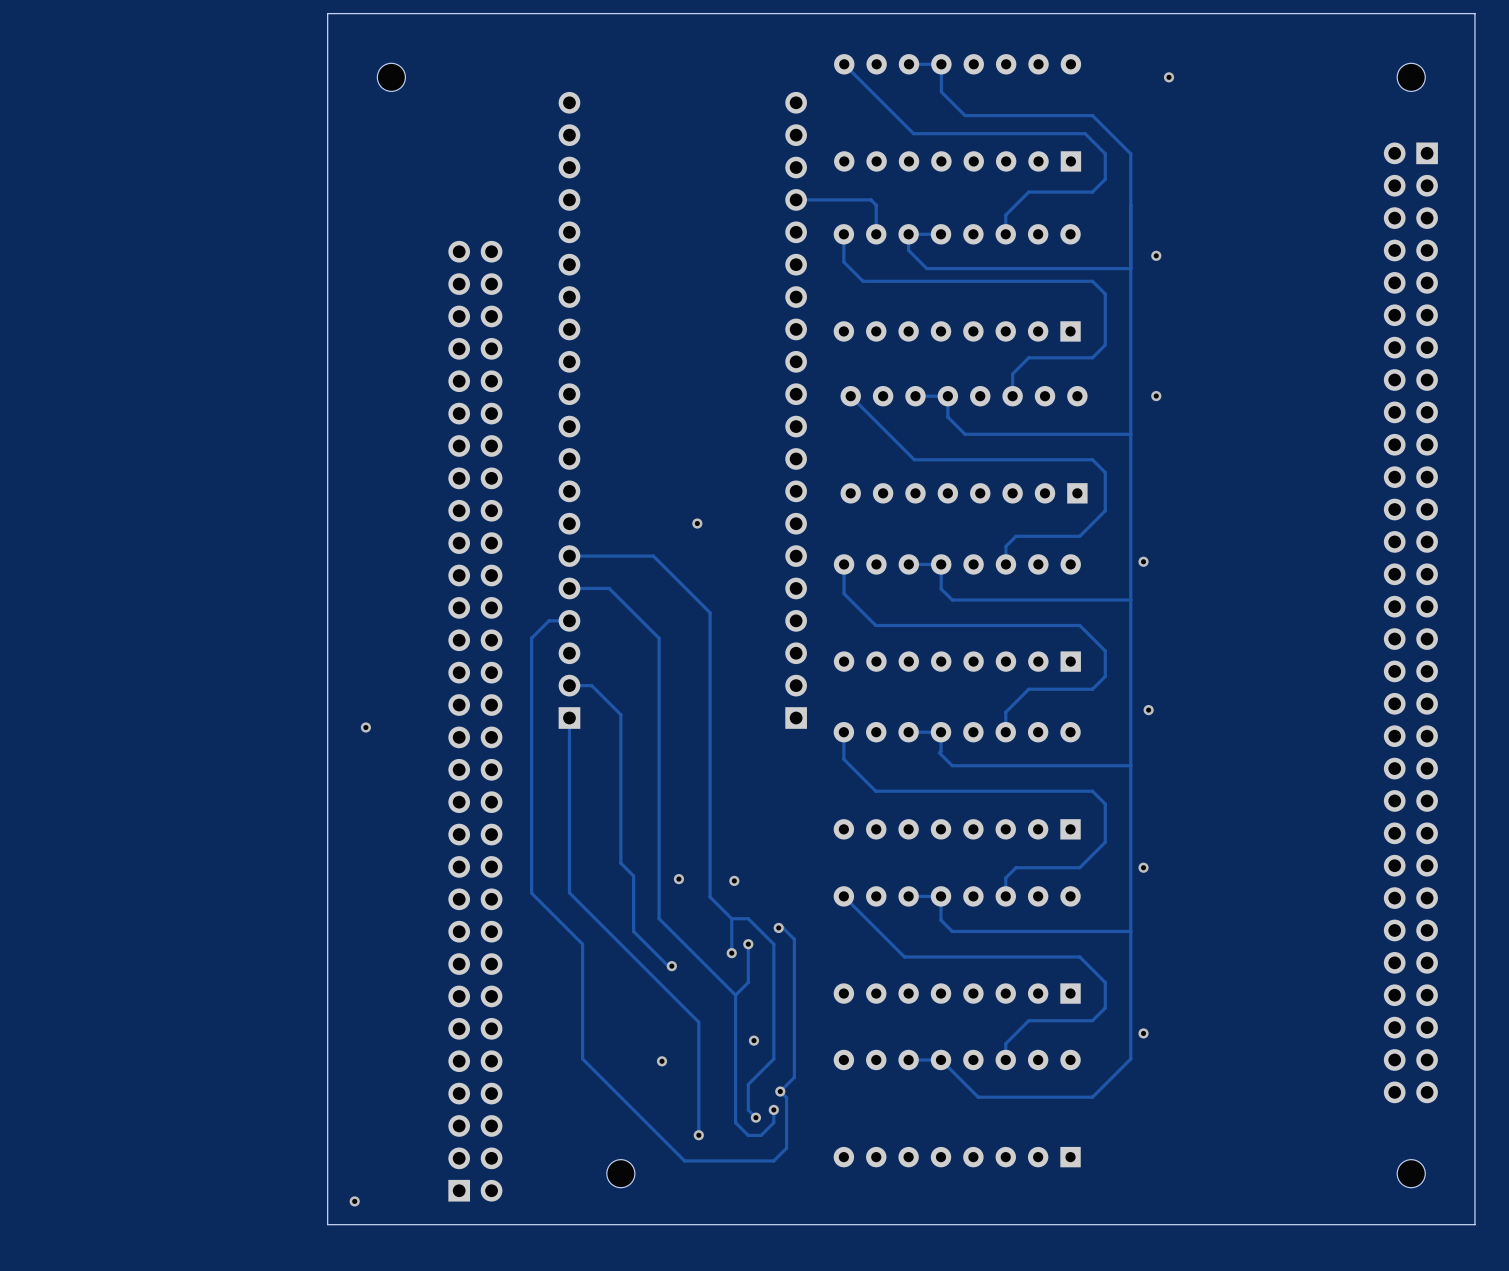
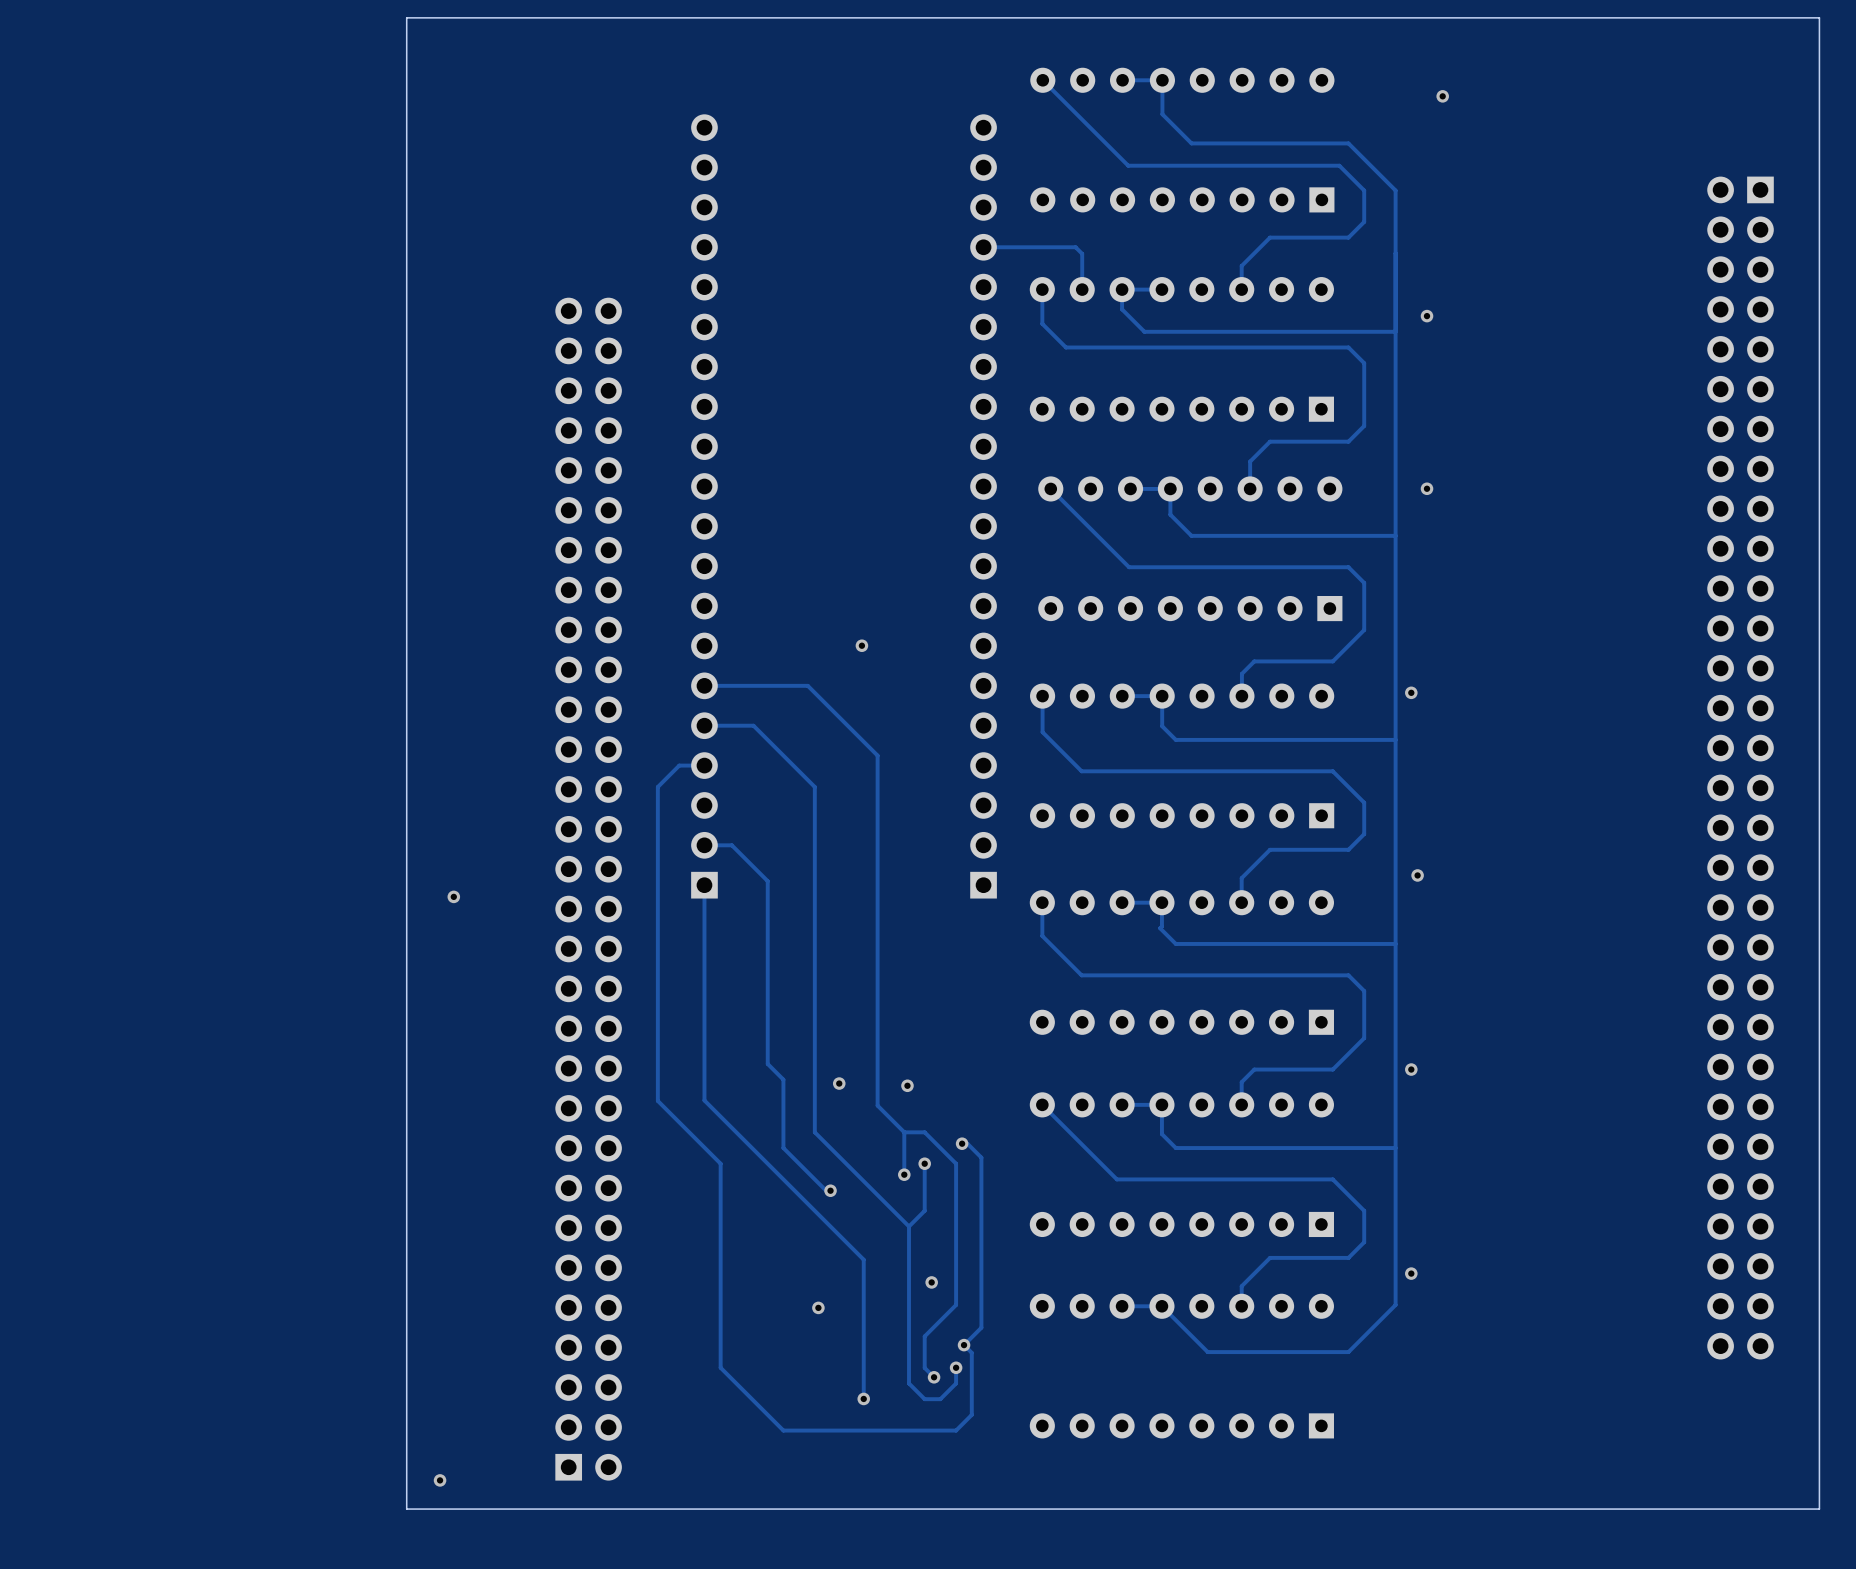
part: (391, 77) -> none
part: (1411, 77) -> none
track: (582, 1058) (684, 1160) -> (720, 1305) (720, 1367) (783, 1430) (846, 1430)
part: (620, 1173) -> none
part: (1411, 1173) -> none

